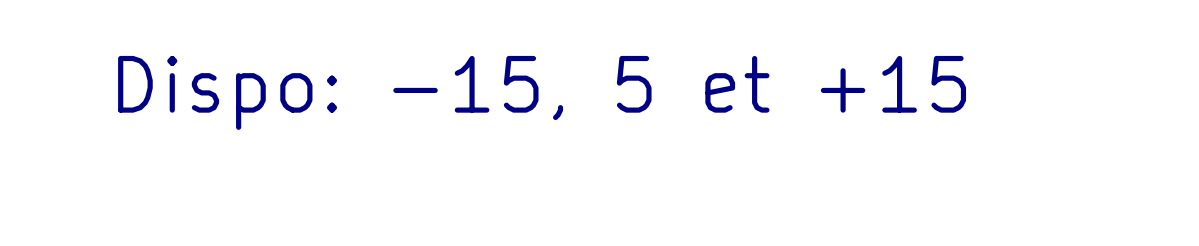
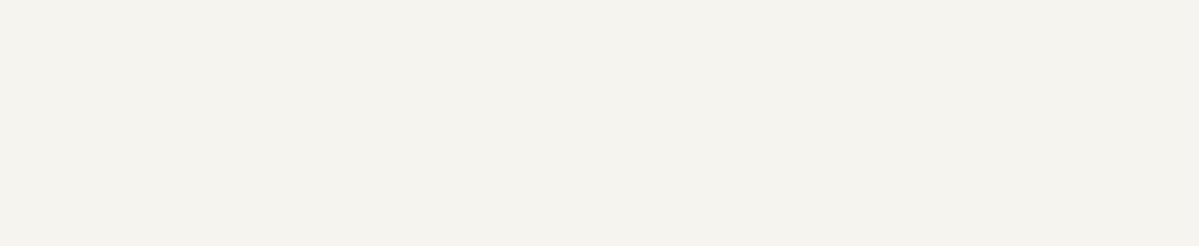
text: Dispo: -15, 5 et +15 (542, 92) -> none

